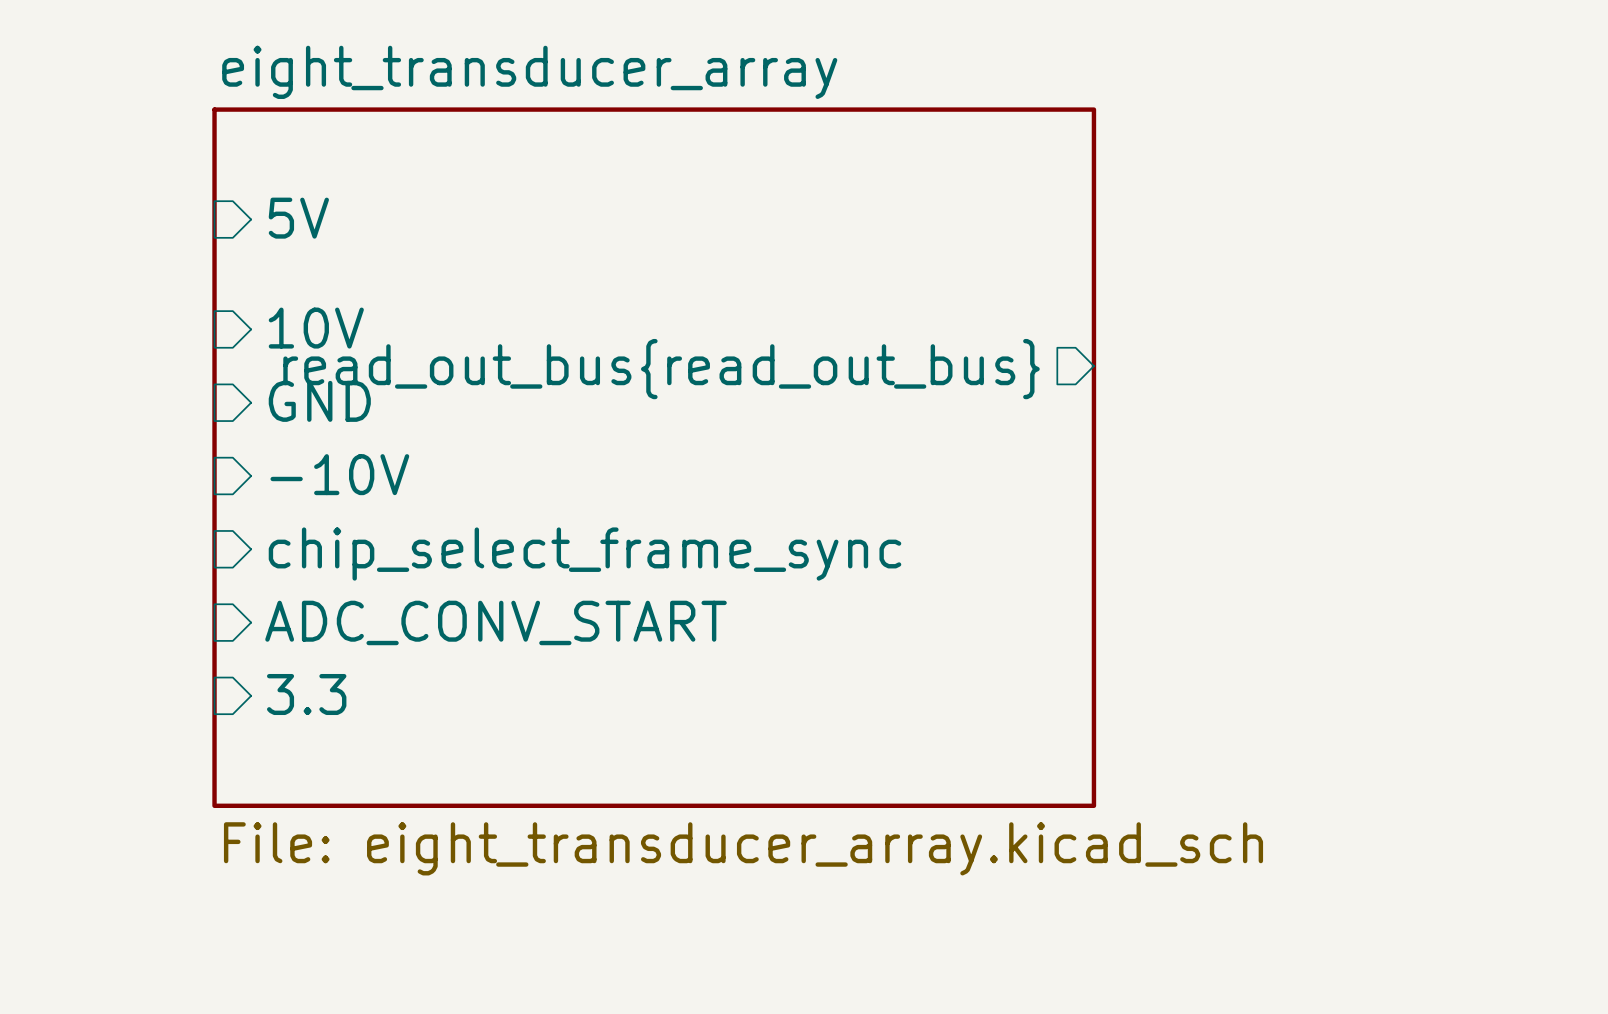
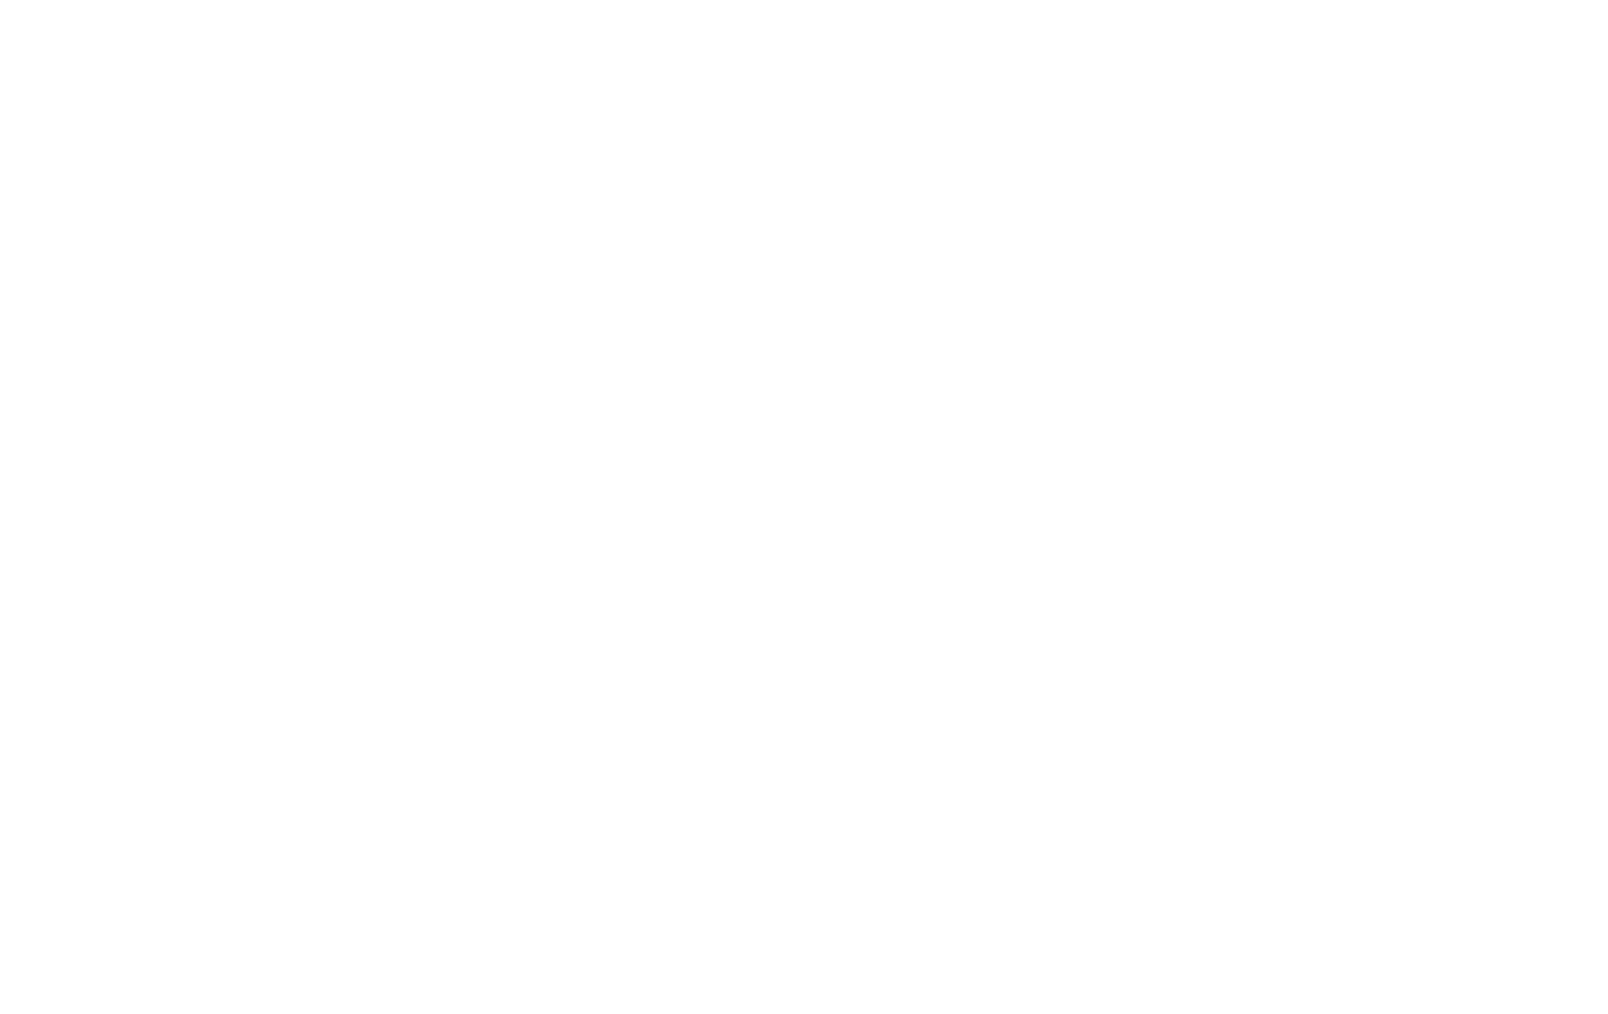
sheet pin: 5V (298, 218) -> none
sheet pin: 10V (316, 328) -> none
sheet pin: read_out_bus{read_out_bus} (661, 369) -> none
sheet pin: GND (319, 401) -> none
sheet eight_transducer_array: File: eight_transducer_array.kicad_sch (654, 457) -> none
sheet pin: -10V (339, 474) -> none
sheet pin: chip_select_frame_sync (585, 554) -> none
sheet pin: ADC_CONV_START (496, 622) -> none
sheet pin: 3.3 (306, 694) -> none

